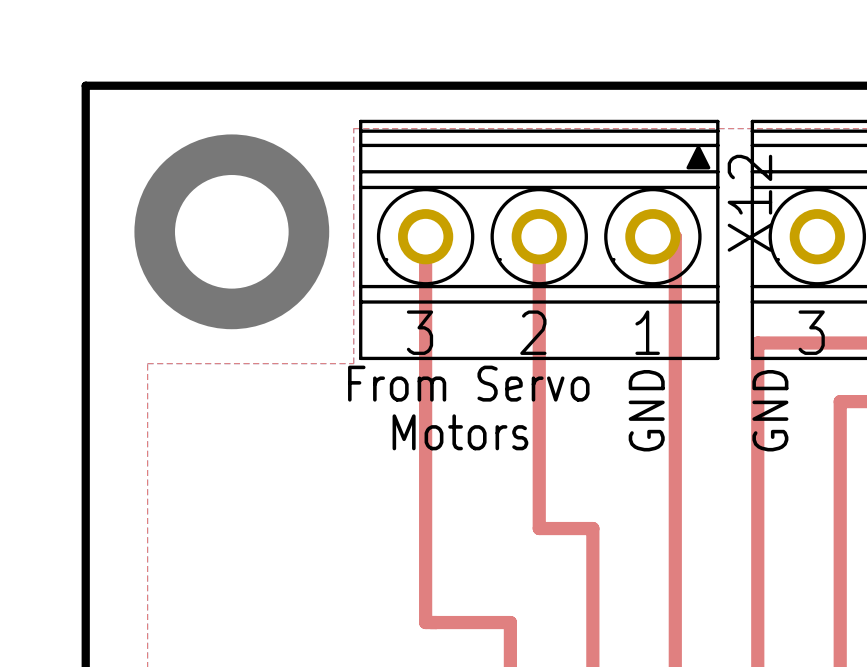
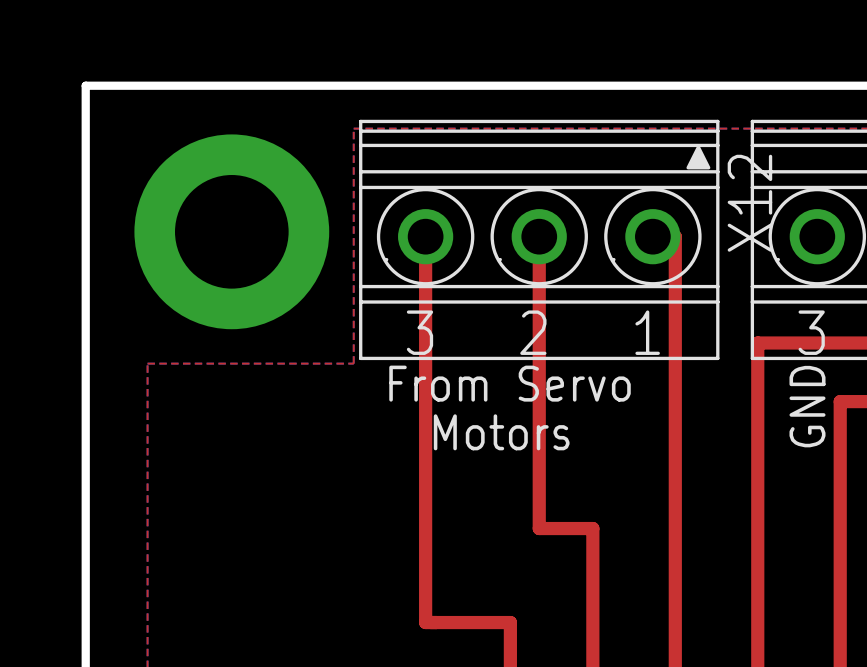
text position: From Servo (468, 383) -> From Servo (510, 383)
text: GND (646, 410) -> none
text position: GND (770, 410) -> GND (807, 406)
text position: Motors (460, 432) -> Motors (501, 432)

